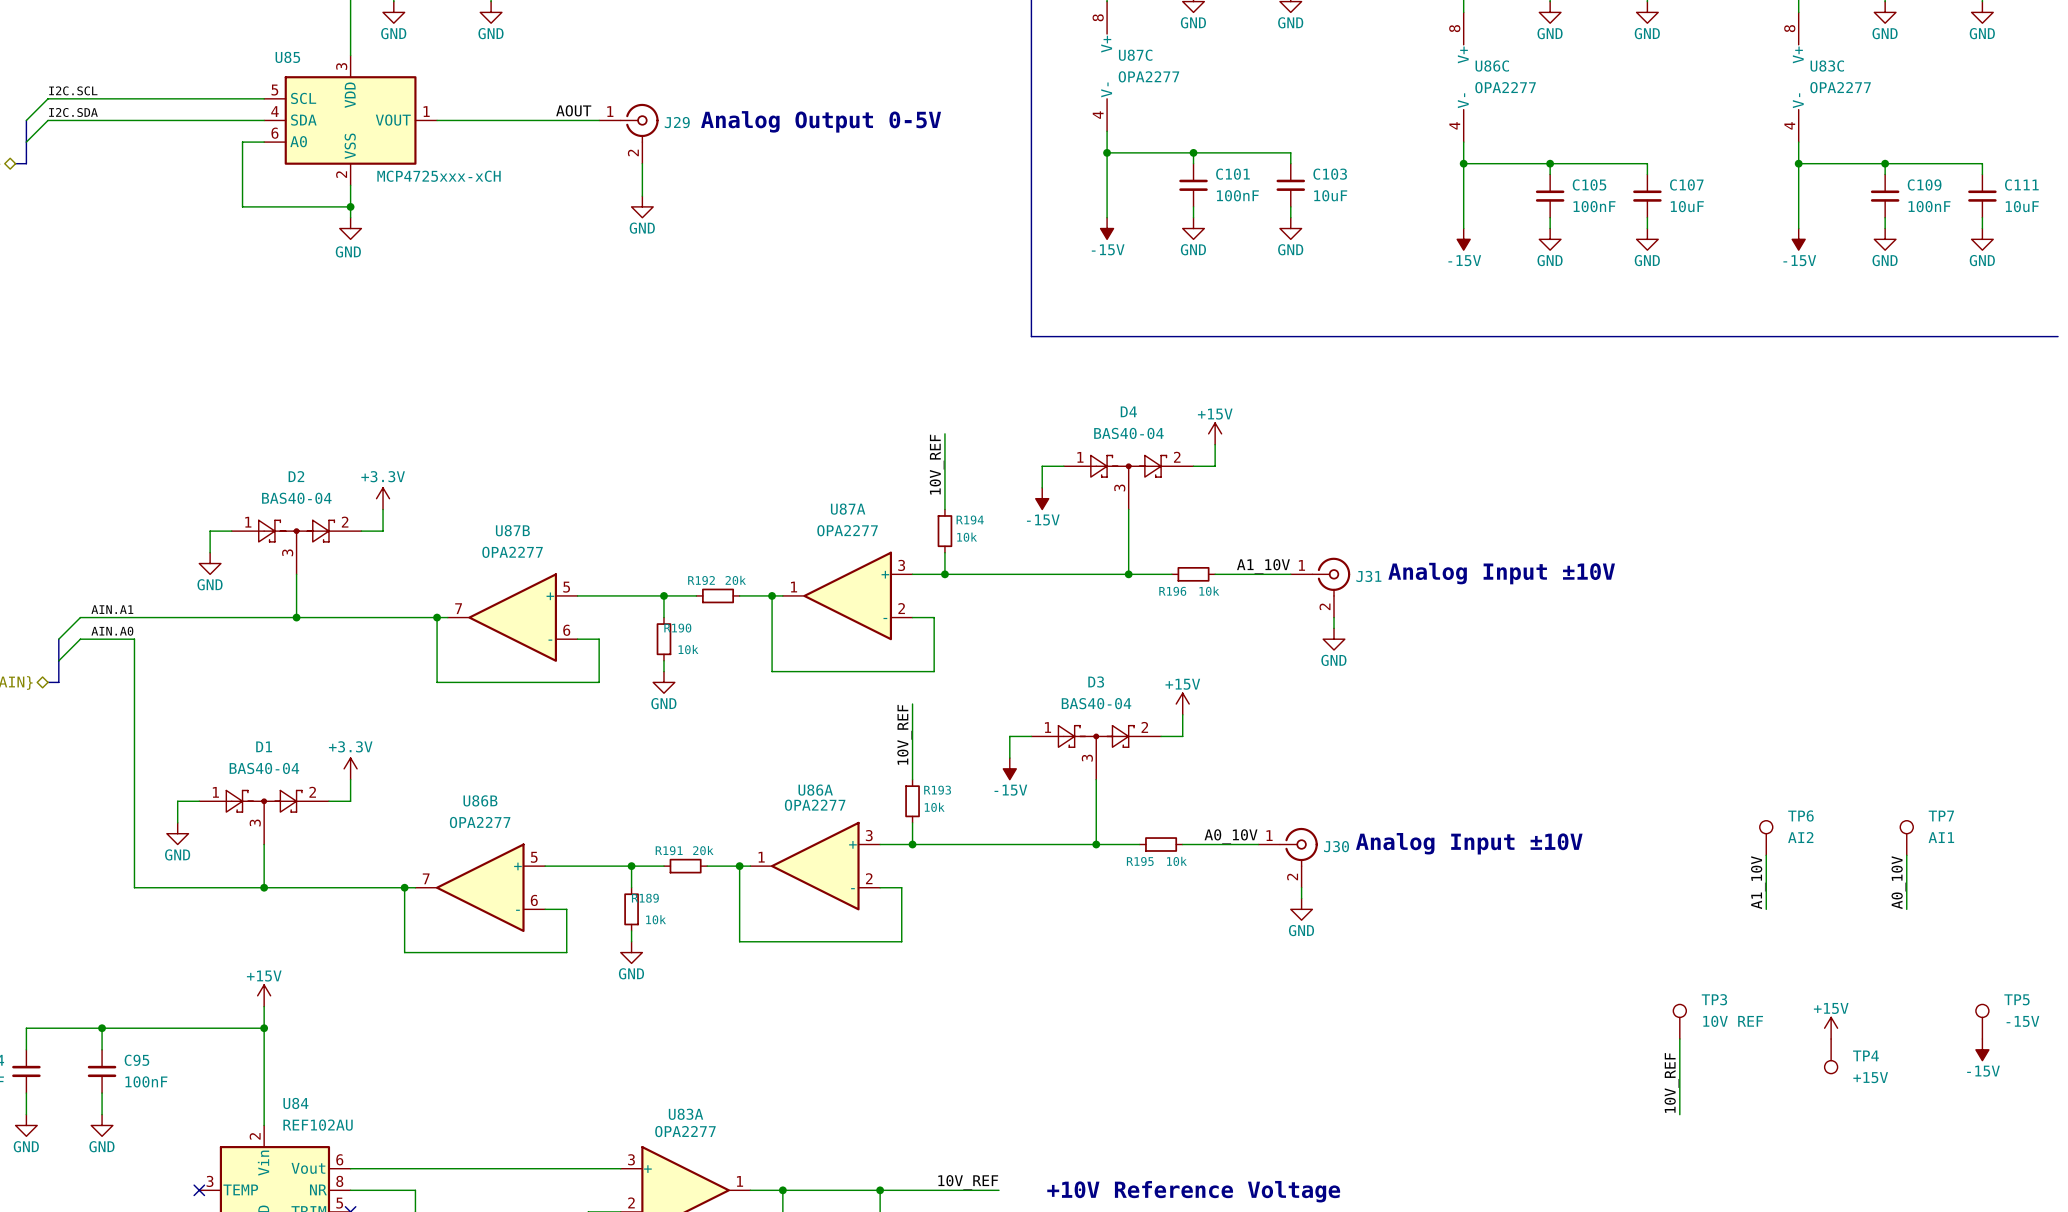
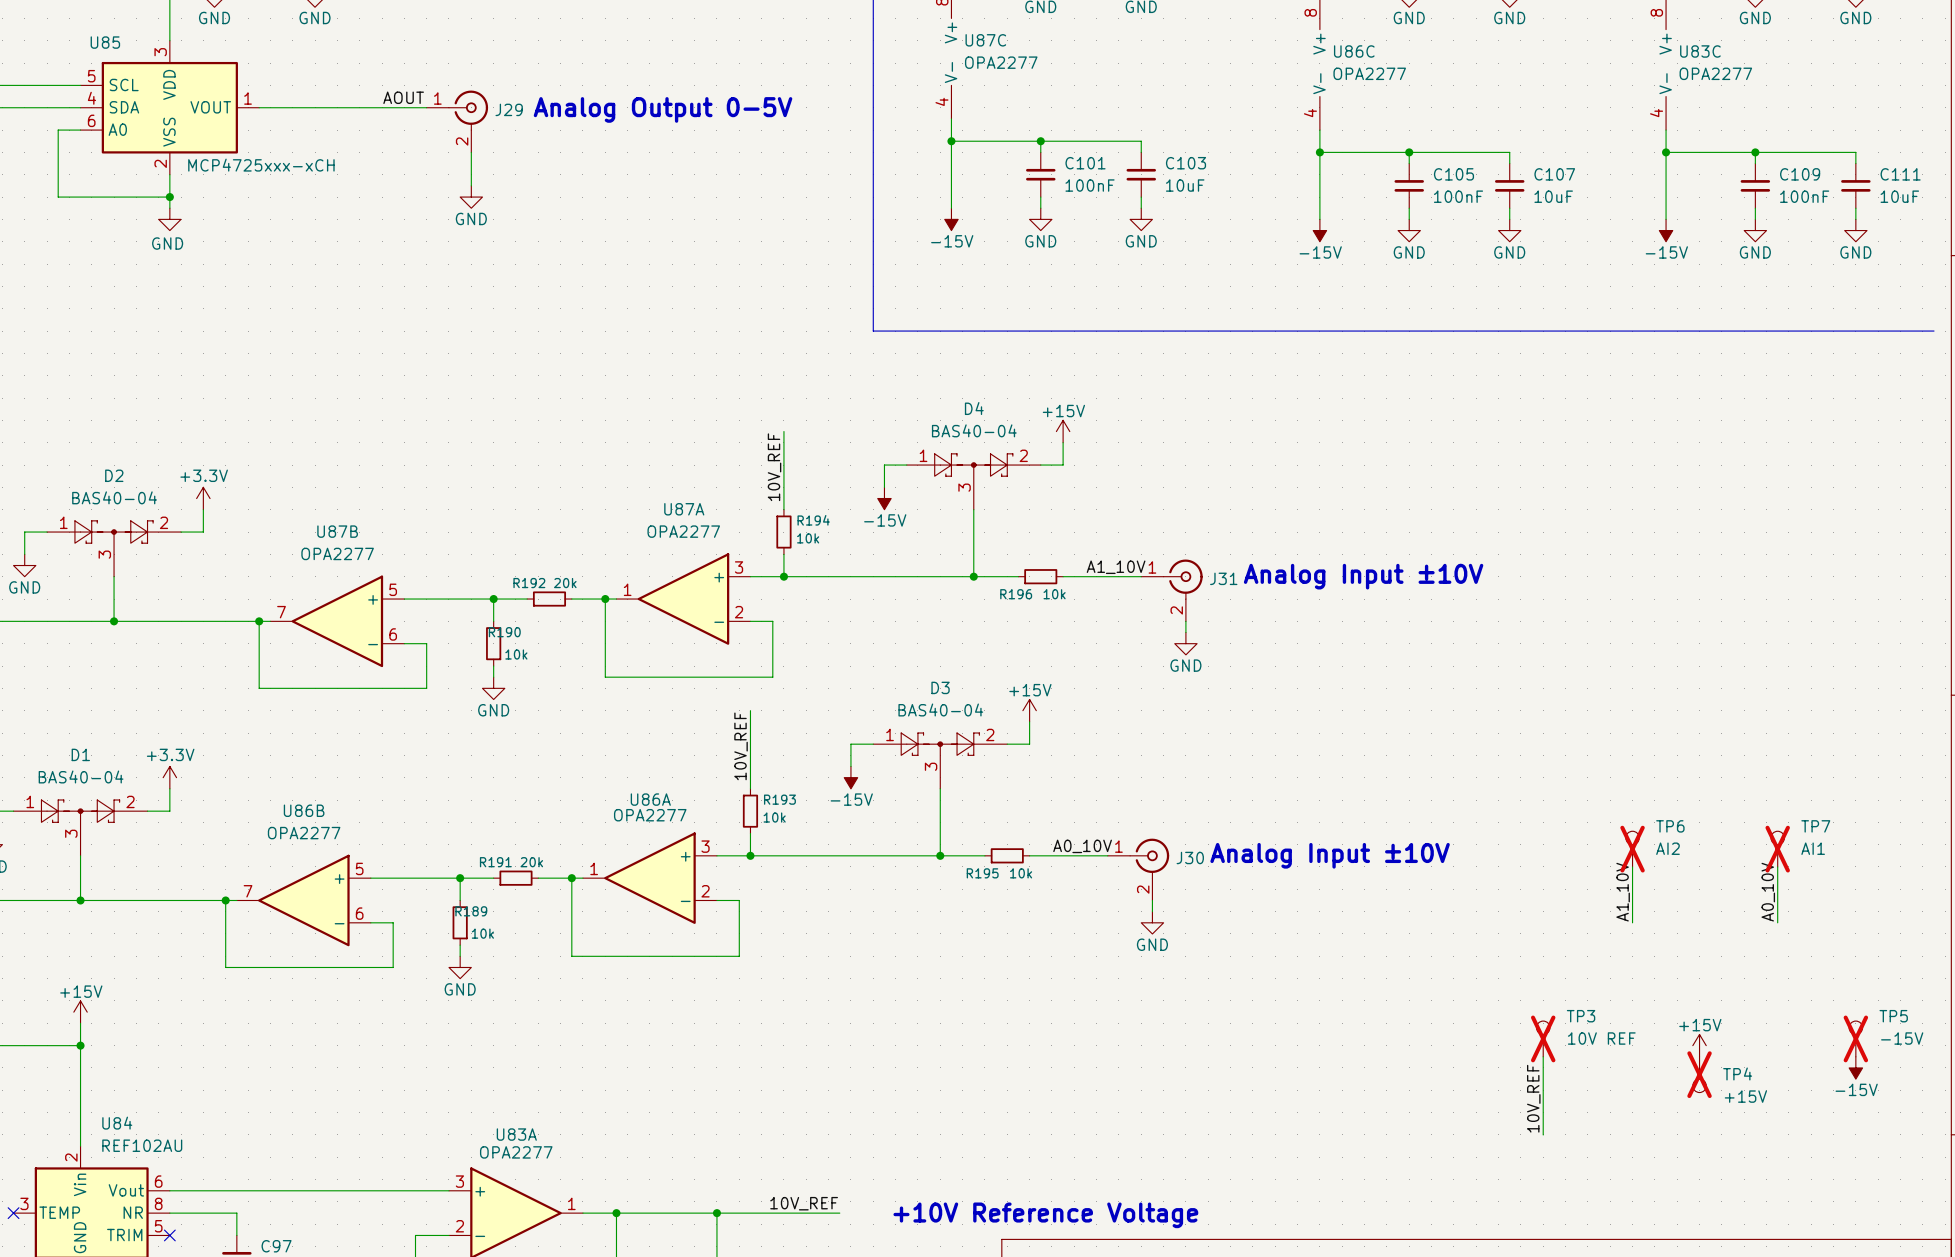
TP6 do-not-place cross: none -> (1632, 849)
TP7 do-not-place cross: none -> (1777, 849)
TP3 do-not-place cross: none -> (1543, 1038)
TP5 do-not-place cross: none -> (1855, 1038)
TP4 do-not-place cross: none -> (1699, 1074)

